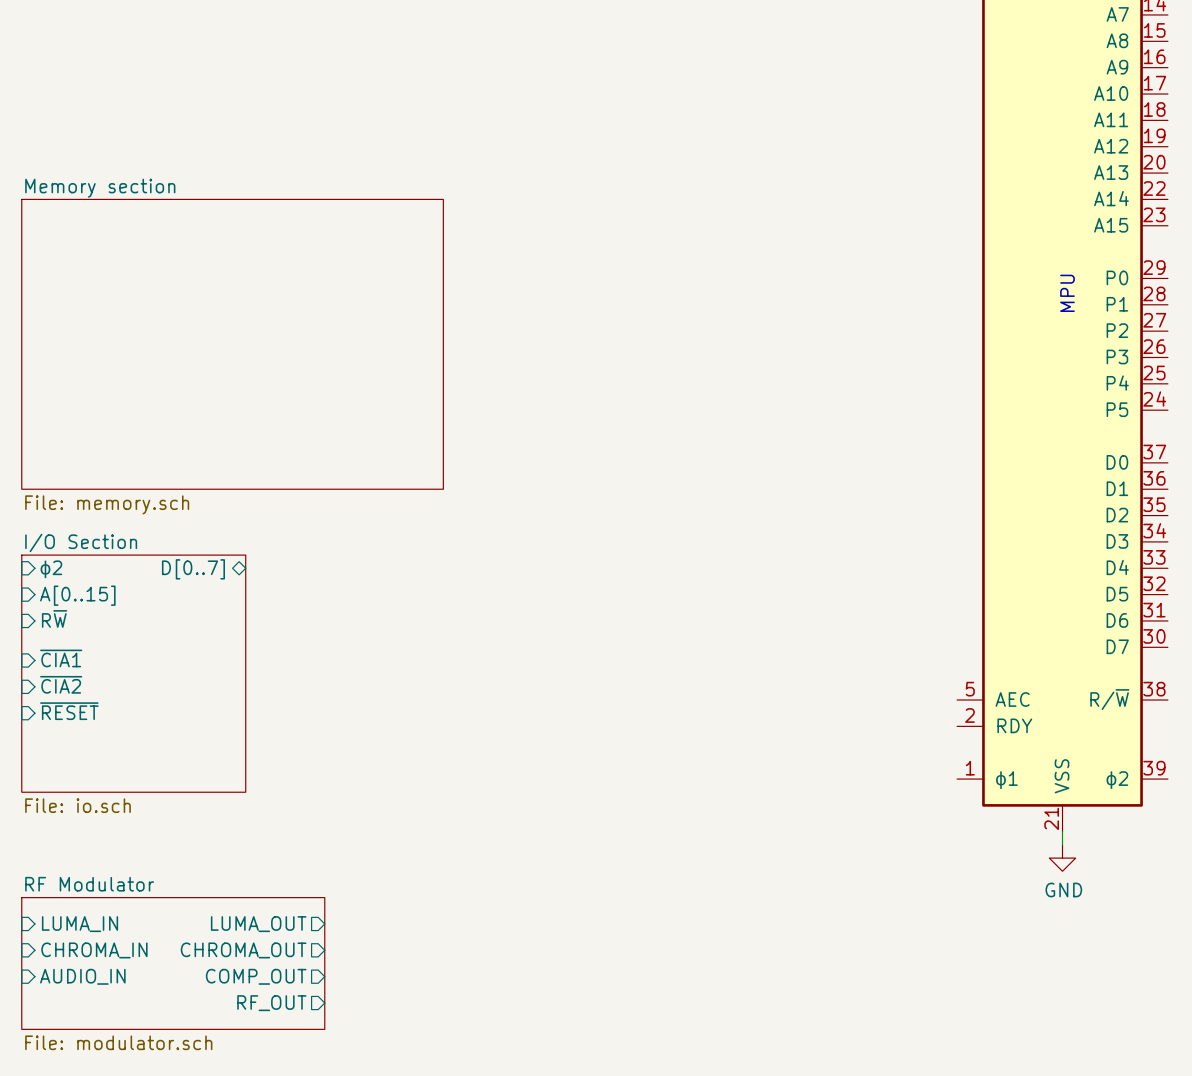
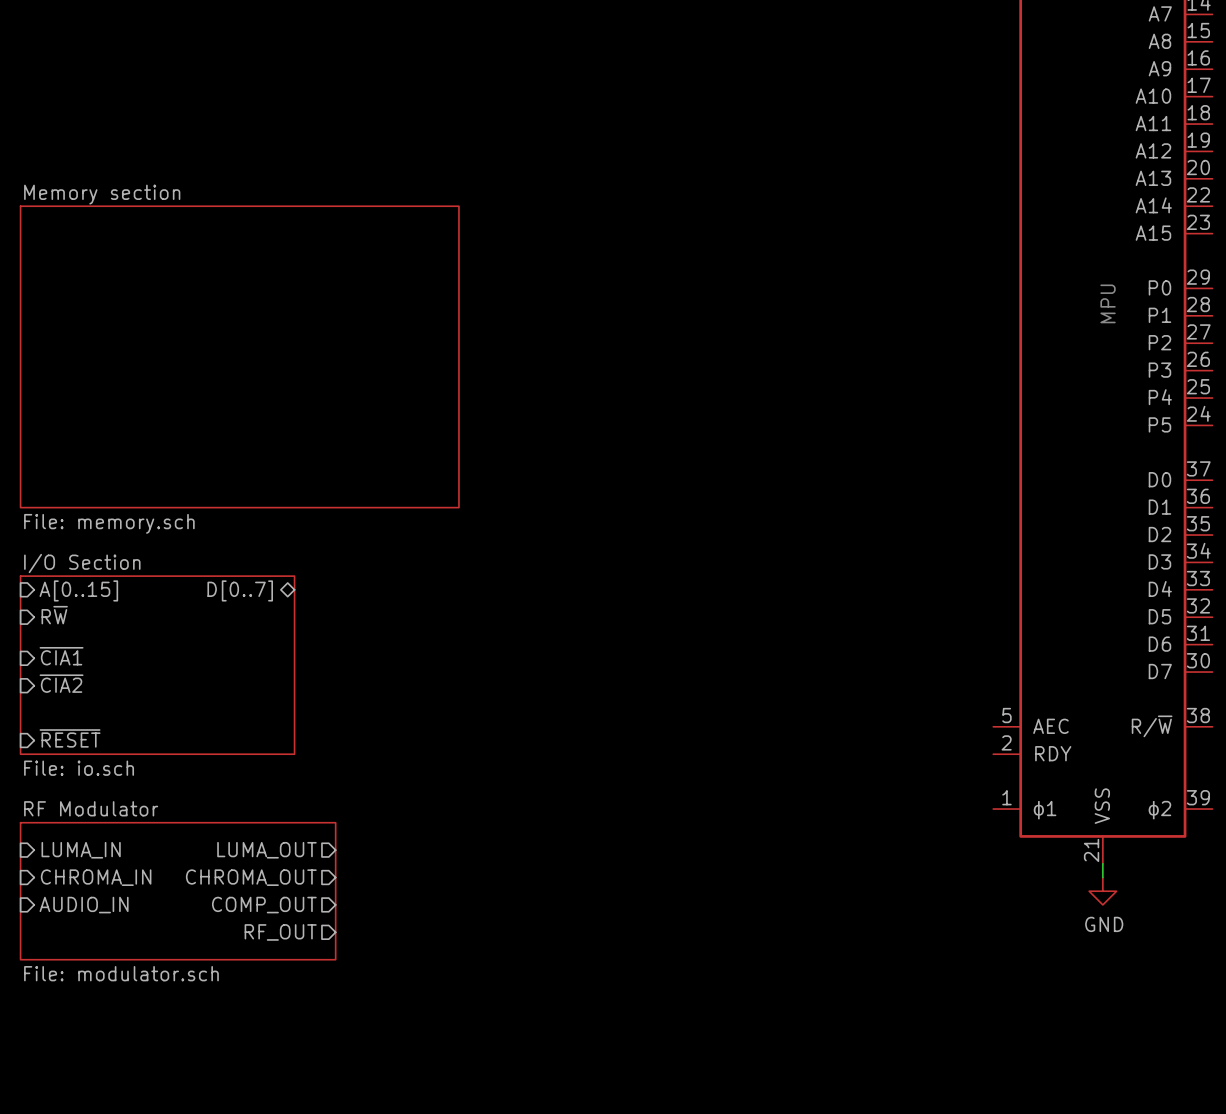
sheet pin: ϕ2 (51, 569) -> A[0..15] (78, 590)
sheet pin position: D[0..7] (193, 569) -> D[0..7] (240, 590)
sheet pin: A[0..15] (77, 595) -> R~{W} (54, 615)
sheet pin: R~{W} (54, 618) -> none
sheet pin: none -> ~{CIA1} (61, 656)
sheet I/O Section: none -> File: io.sch (157, 665)
sheet pin: ~{CIA1} (61, 658) -> ~{CIA2} (61, 683)
sheet I/O Section: File: io.sch (133, 673) -> none
sheet pin: ~{CIA2} (61, 684) -> none
sheet pin position: LUMA_IN (80, 924) -> LUMA_IN (81, 850)
sheet pin position: LUMA_OUT (258, 924) -> LUMA_OUT (266, 850)
sheet pin position: CHROMA_IN (94, 950) -> CHROMA_IN (96, 877)
sheet pin position: CHROMA_OUT (243, 950) -> CHROMA_OUT (251, 877)
sheet RF Modulator position: (173, 963) -> (178, 891)
sheet pin position: AUDIO_IN (82, 976) -> AUDIO_IN (84, 905)
sheet pin position: COMP_OUT (256, 976) -> COMP_OUT (264, 905)
sheet pin position: RF_OUT (271, 1003) -> RF_OUT (280, 932)

